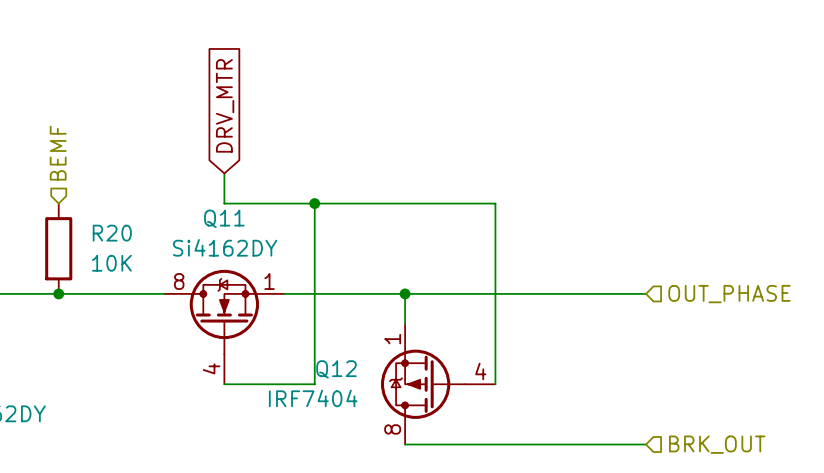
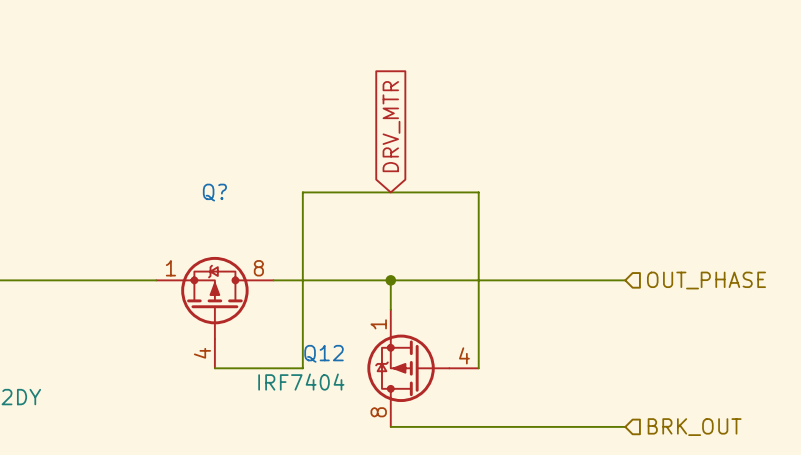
global label position: DRV_MTR (225, 105) -> DRV_MTR (391, 126)
hierarchical label: BEMF (58, 153) -> none
wire: (224, 173) (224, 203) (314, 203) -> none
junction: (314, 203) -> none
R20: 10K (58, 248) -> none
junction: (58, 293) -> none
Q11: Si4162DY (224, 327) -> none
Q?: none -> (214, 312)

